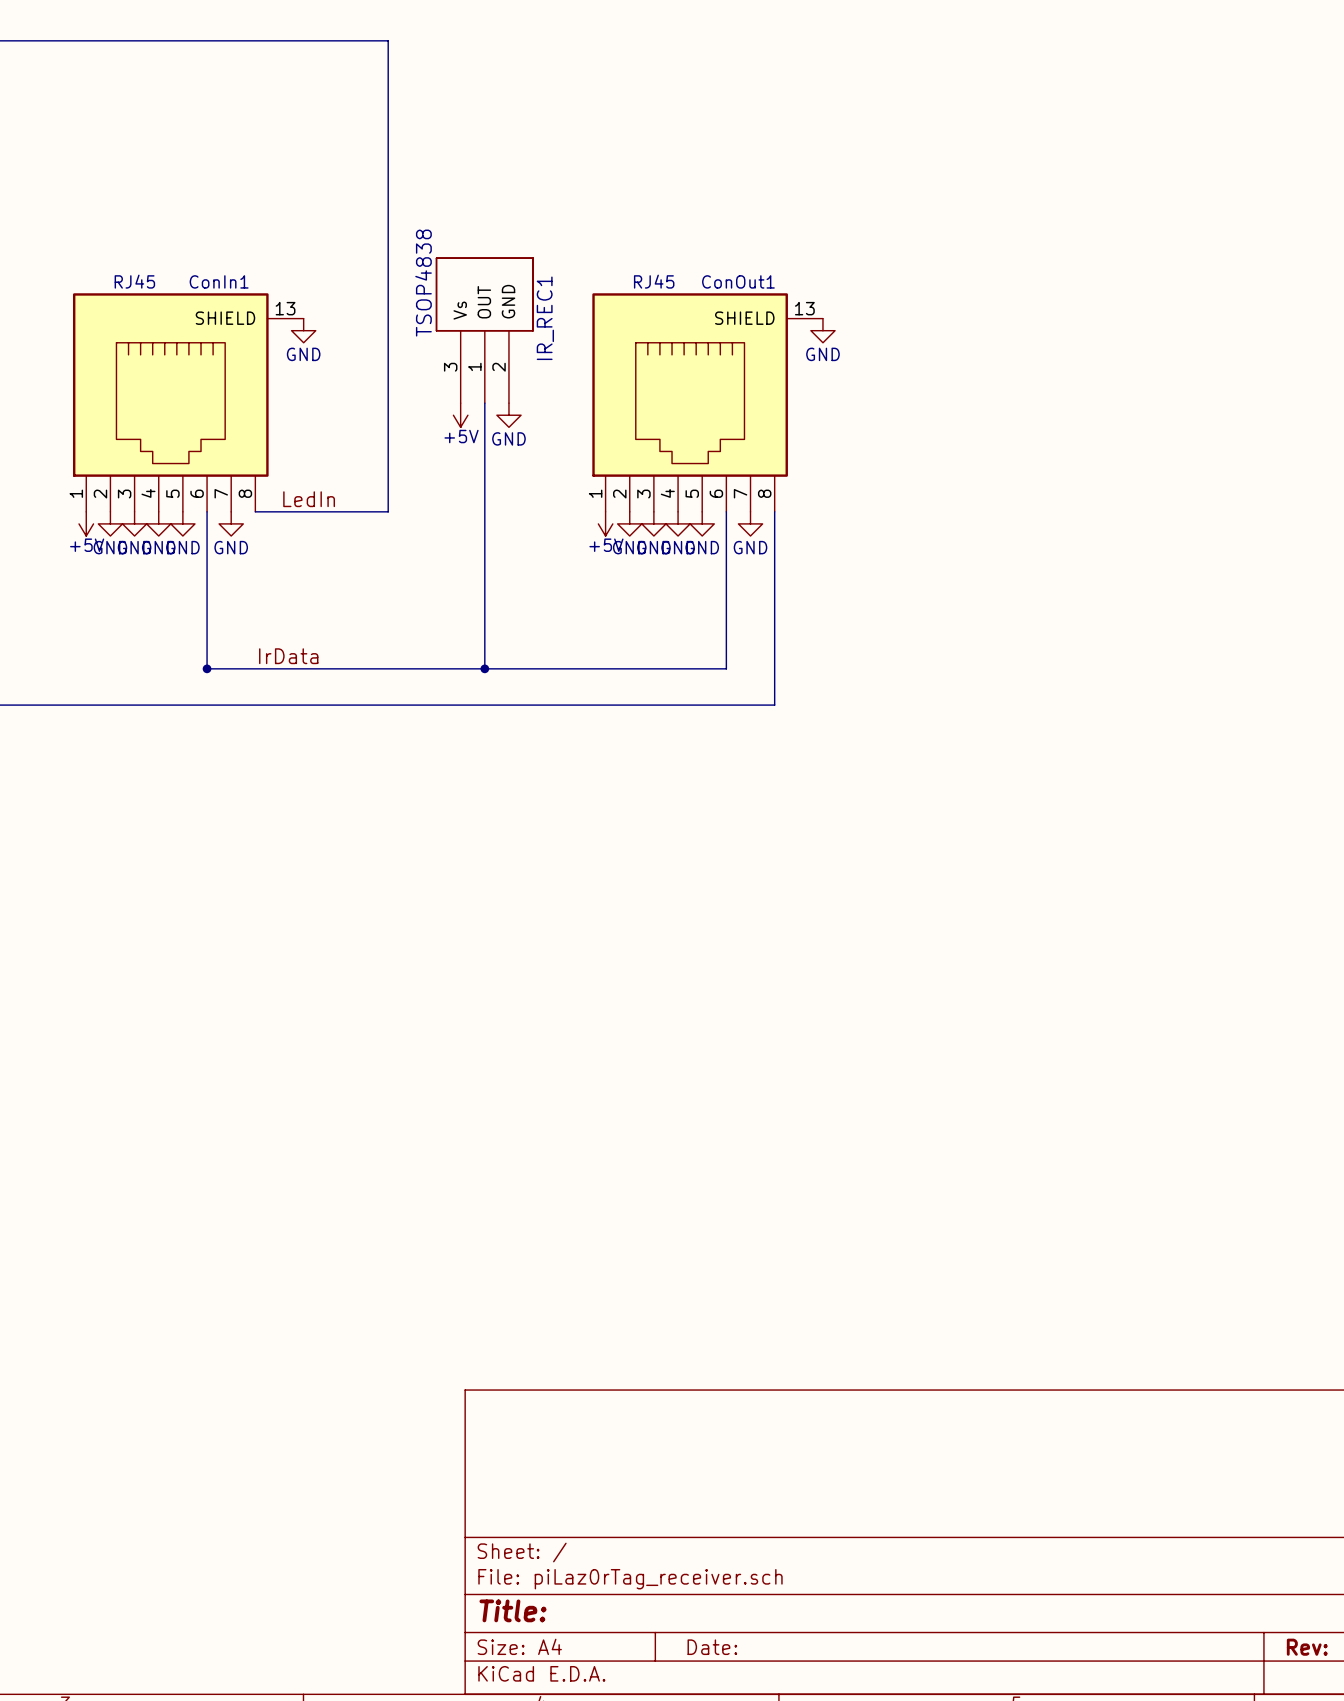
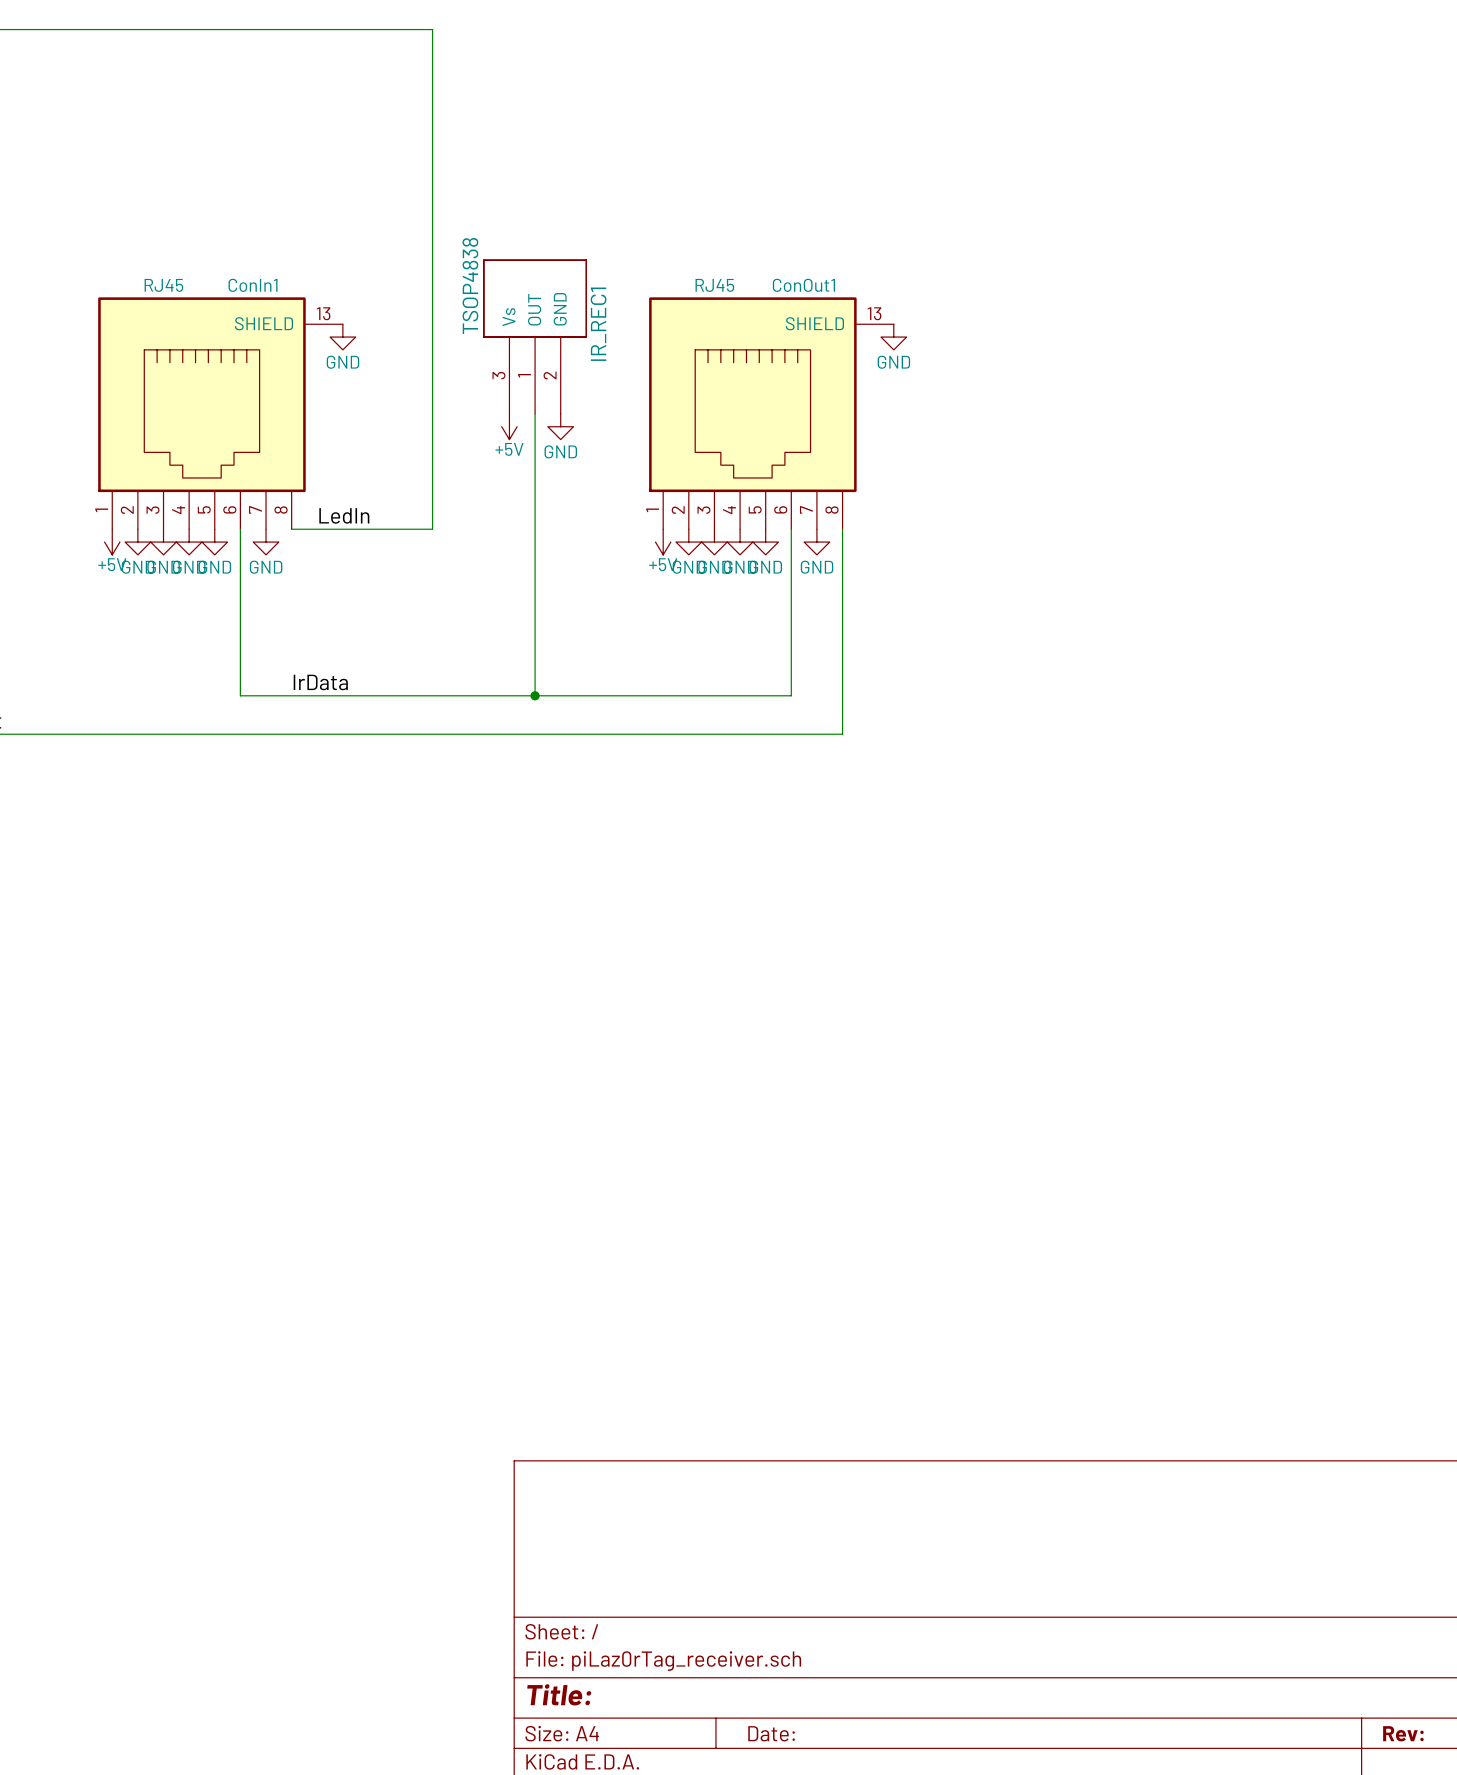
junction: (207, 668) -> none

